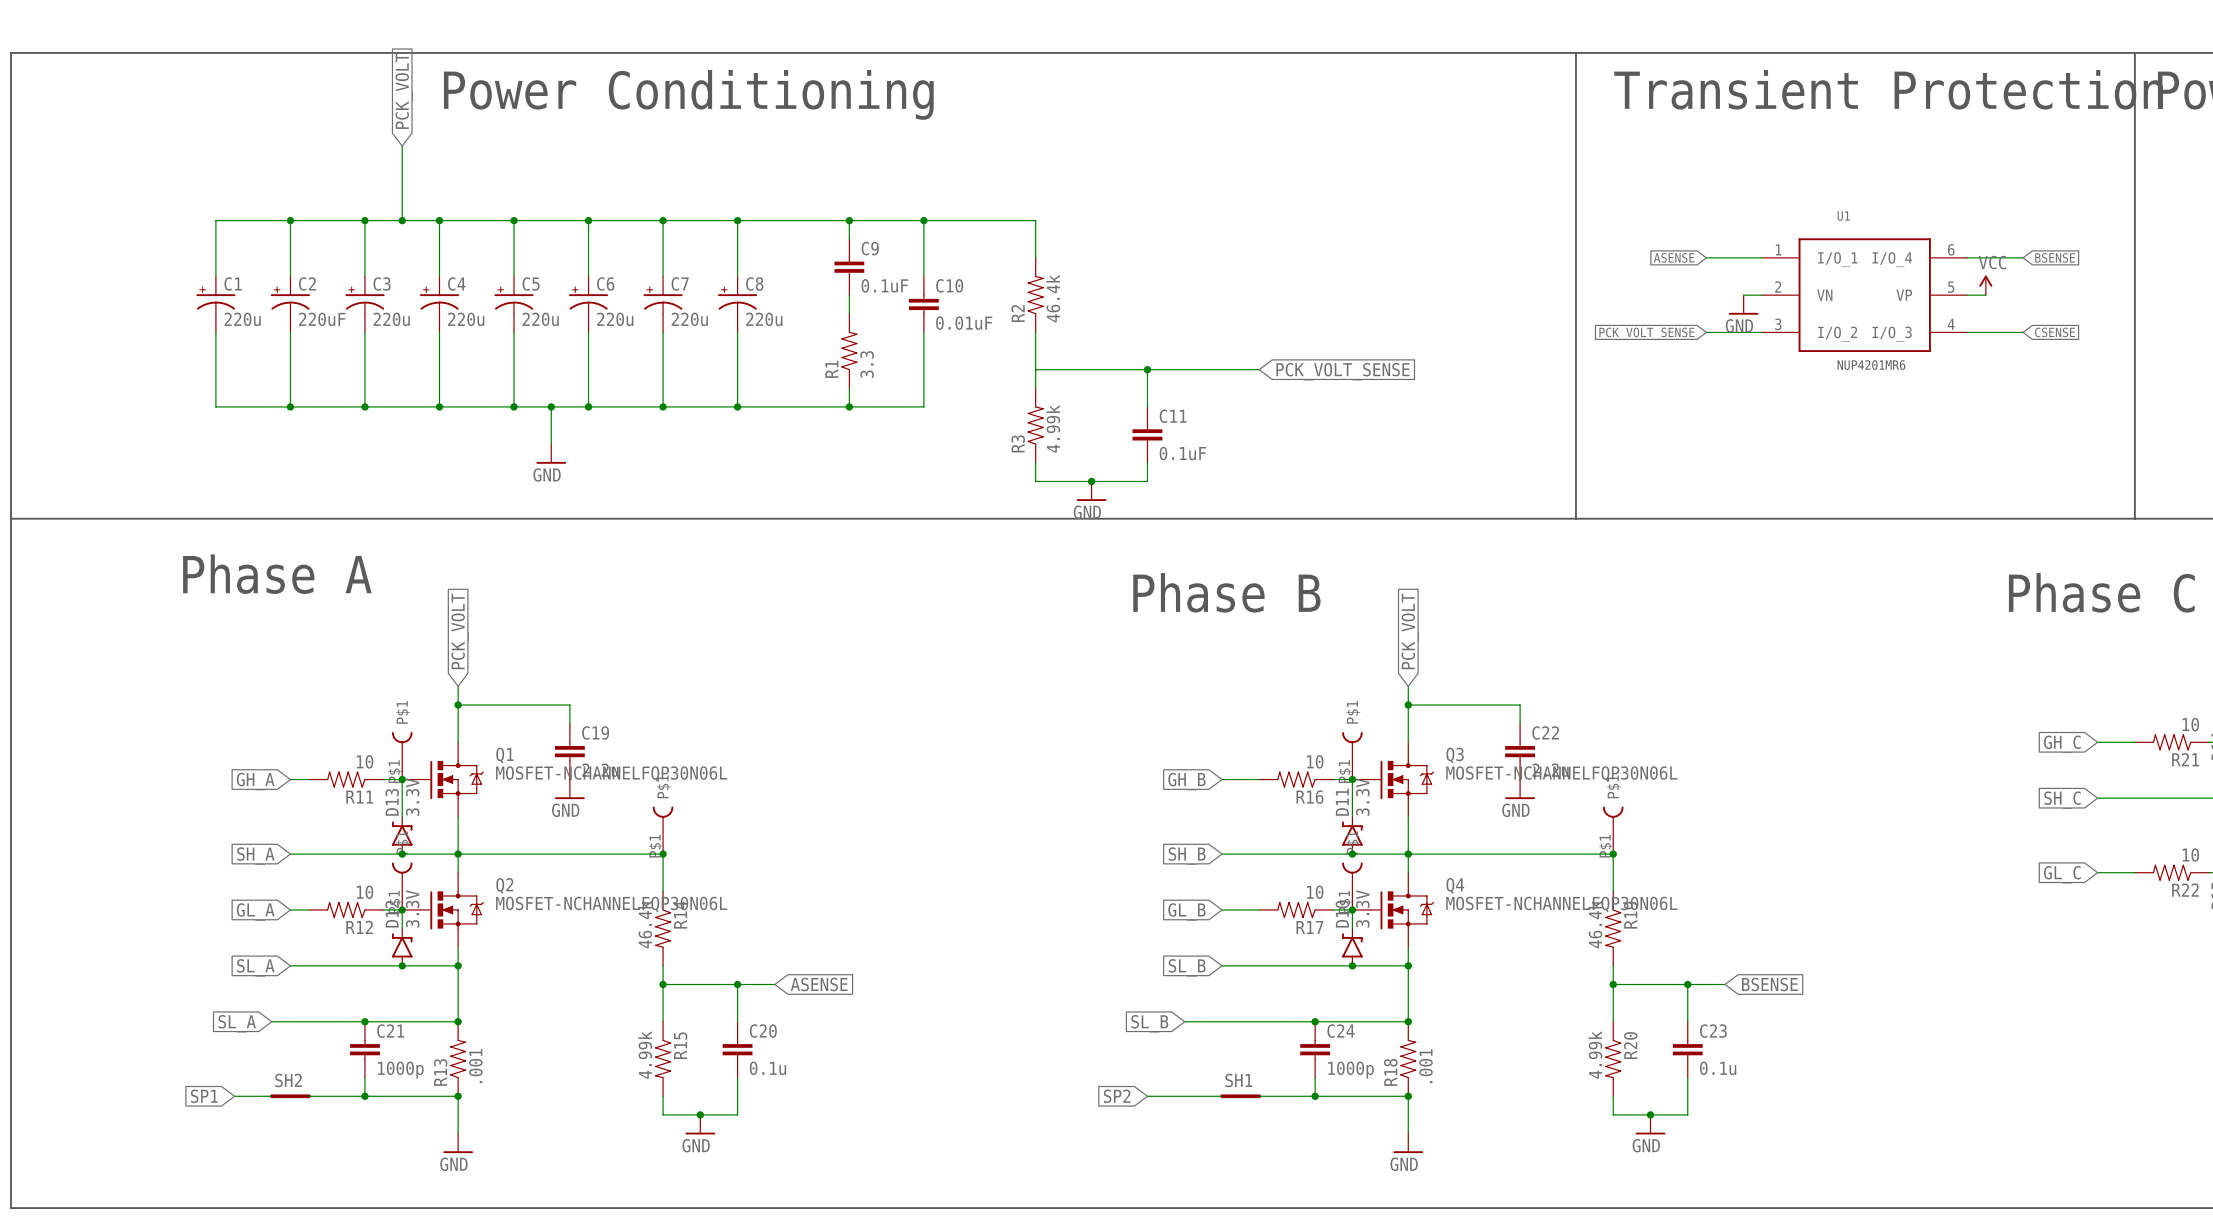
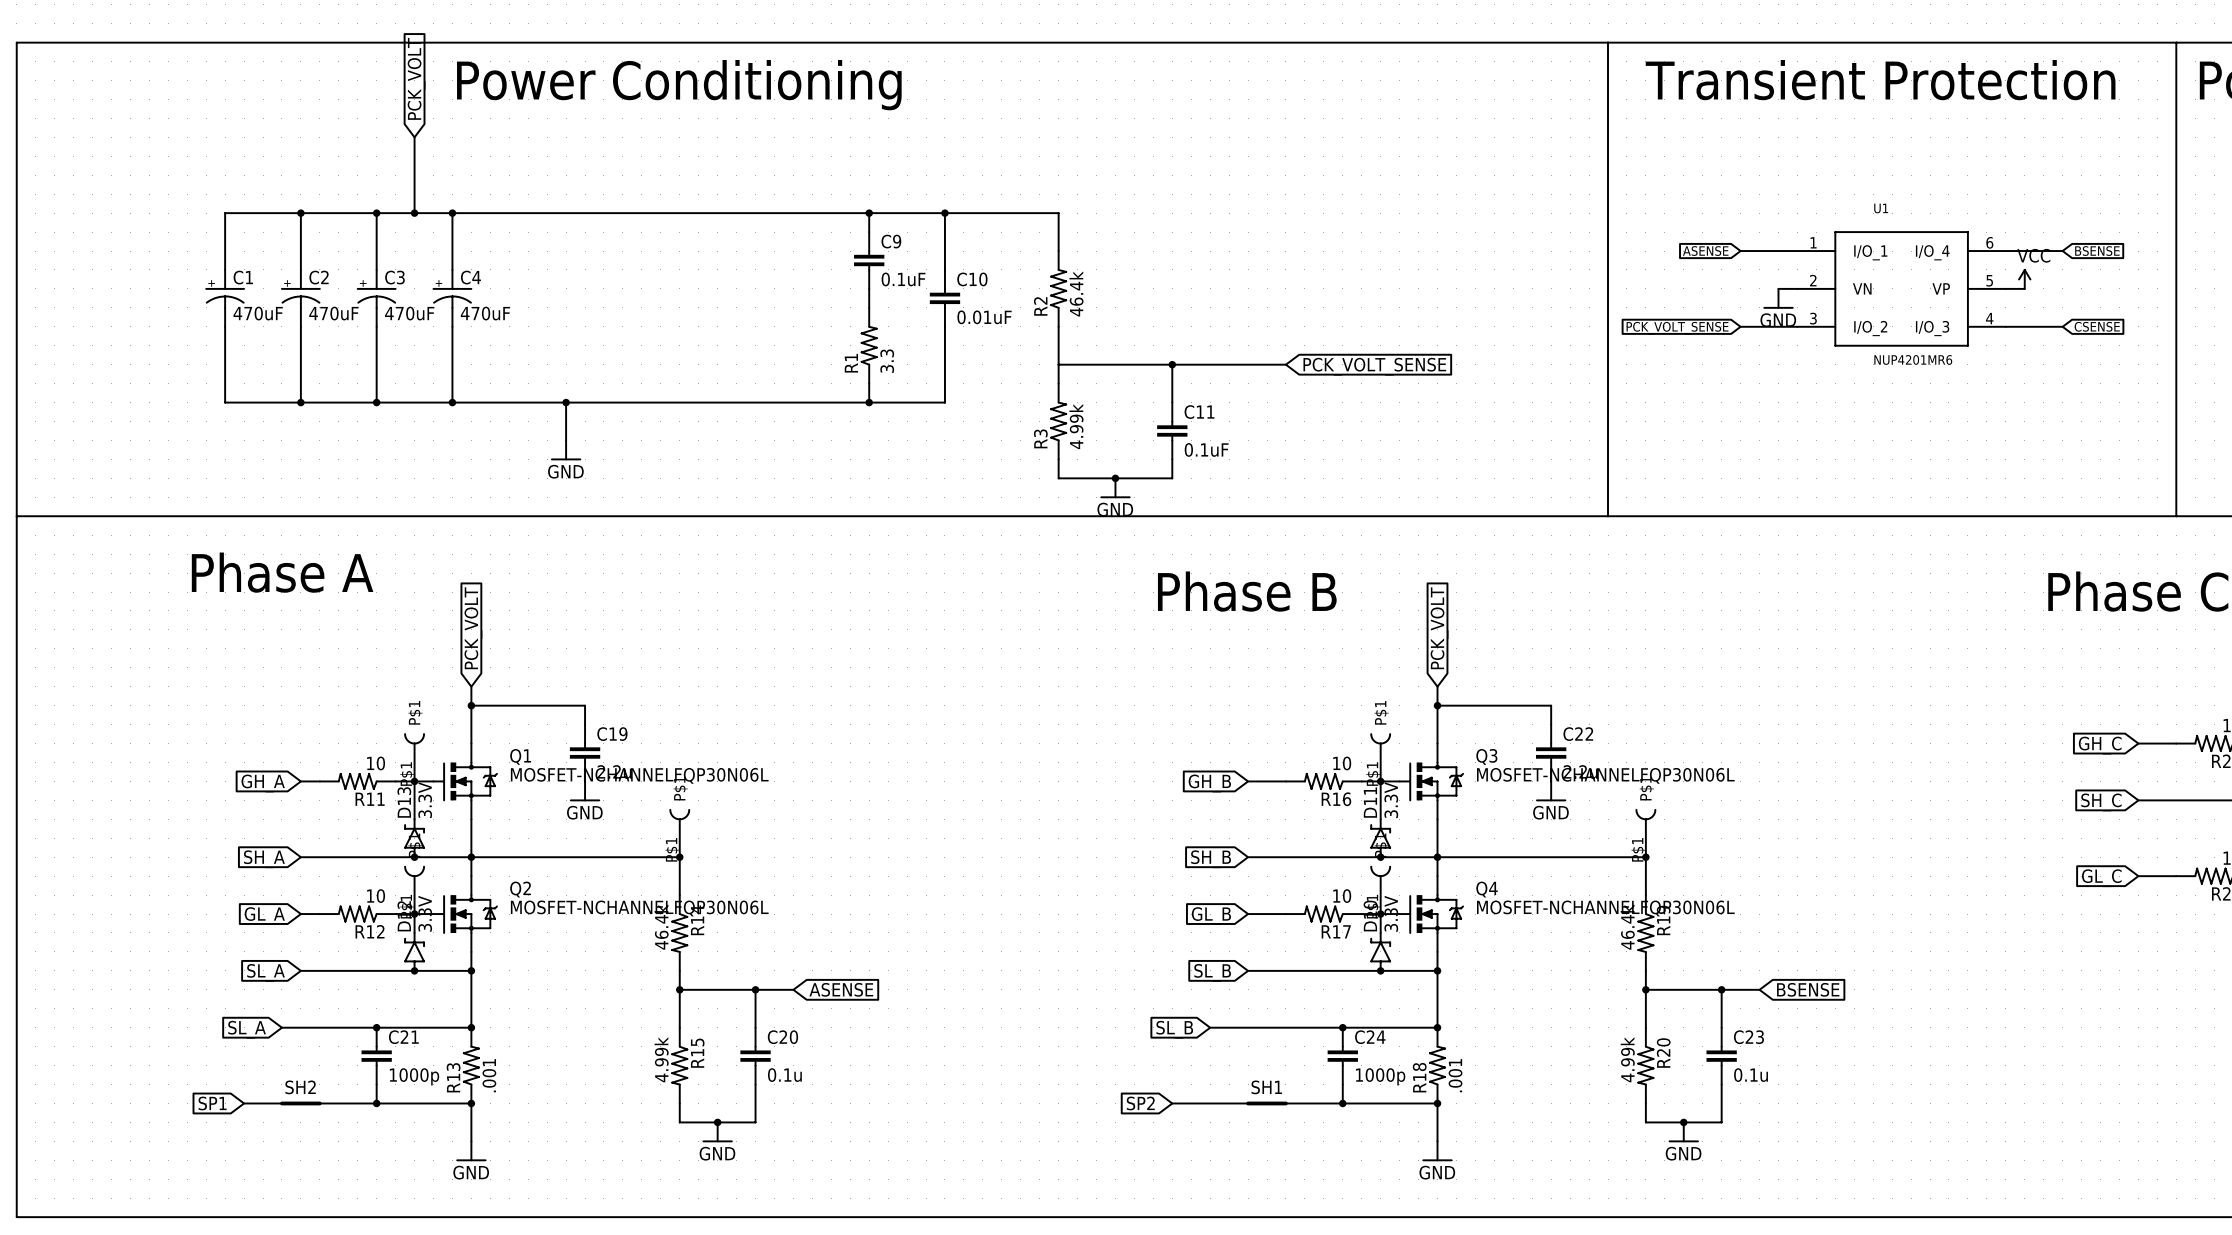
wire: (514, 220) (514, 276) -> none
junction: (514, 220) -> none
wire: (588, 220) (588, 276) -> none
junction: (588, 220) -> none
wire: (663, 220) (663, 276) -> none
junction: (663, 220) -> none
wire: (737, 220) (737, 276) -> none
junction: (737, 220) -> none
C5: 220u (514, 304) -> none
C6: 220u (588, 304) -> none
C7: 220u (663, 304) -> none
C8: 220u (737, 304) -> none
C1 value: 220u (242, 319) -> 470uF (258, 313)
C2 value: 220uF (322, 319) -> 470uF (333, 313)
C3 value: 220u (391, 319) -> 470uF (409, 313)
C4 value: 220u (466, 319) -> 470uF (485, 313)
wire: (514, 332) (514, 406) -> none
wire: (588, 332) (588, 406) -> none
wire: (663, 332) (663, 406) -> none
wire: (737, 332) (737, 406) -> none
junction: (514, 406) -> none
junction: (588, 406) -> none
junction: (663, 406) -> none
junction: (737, 406) -> none

